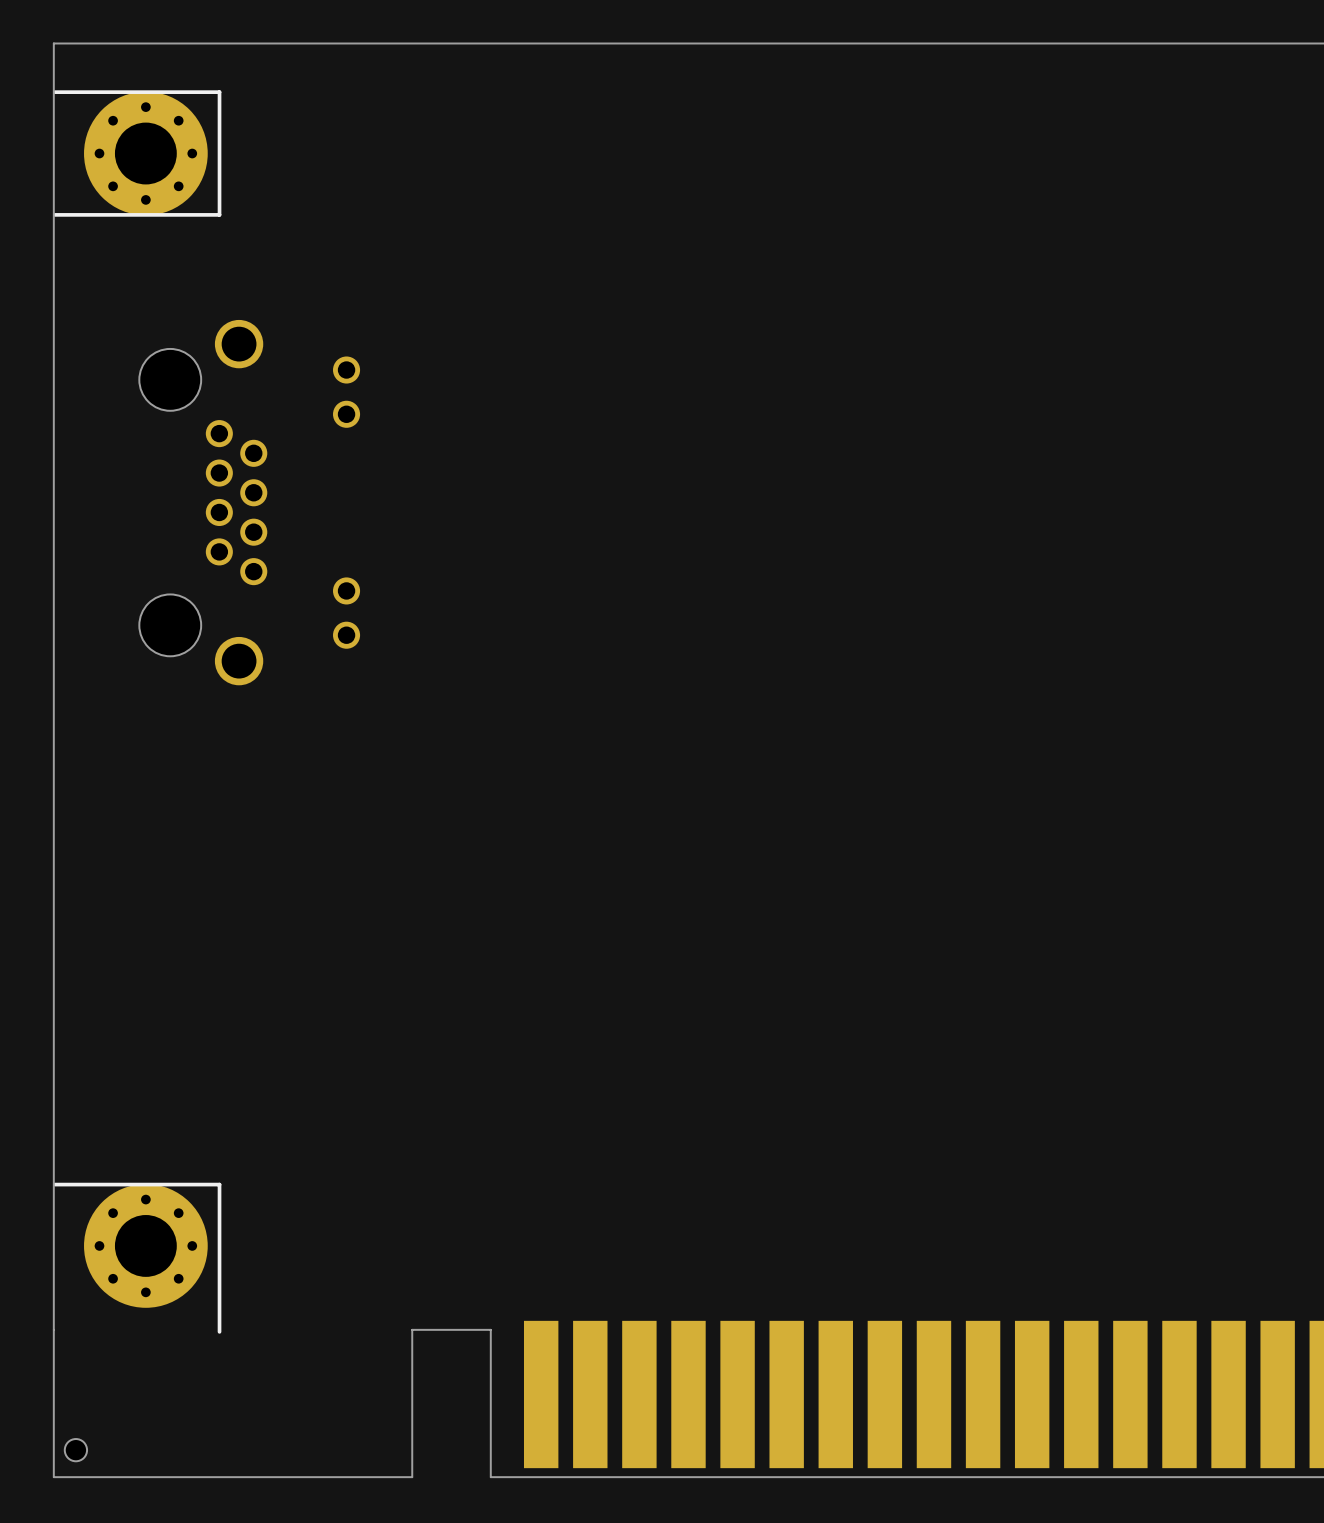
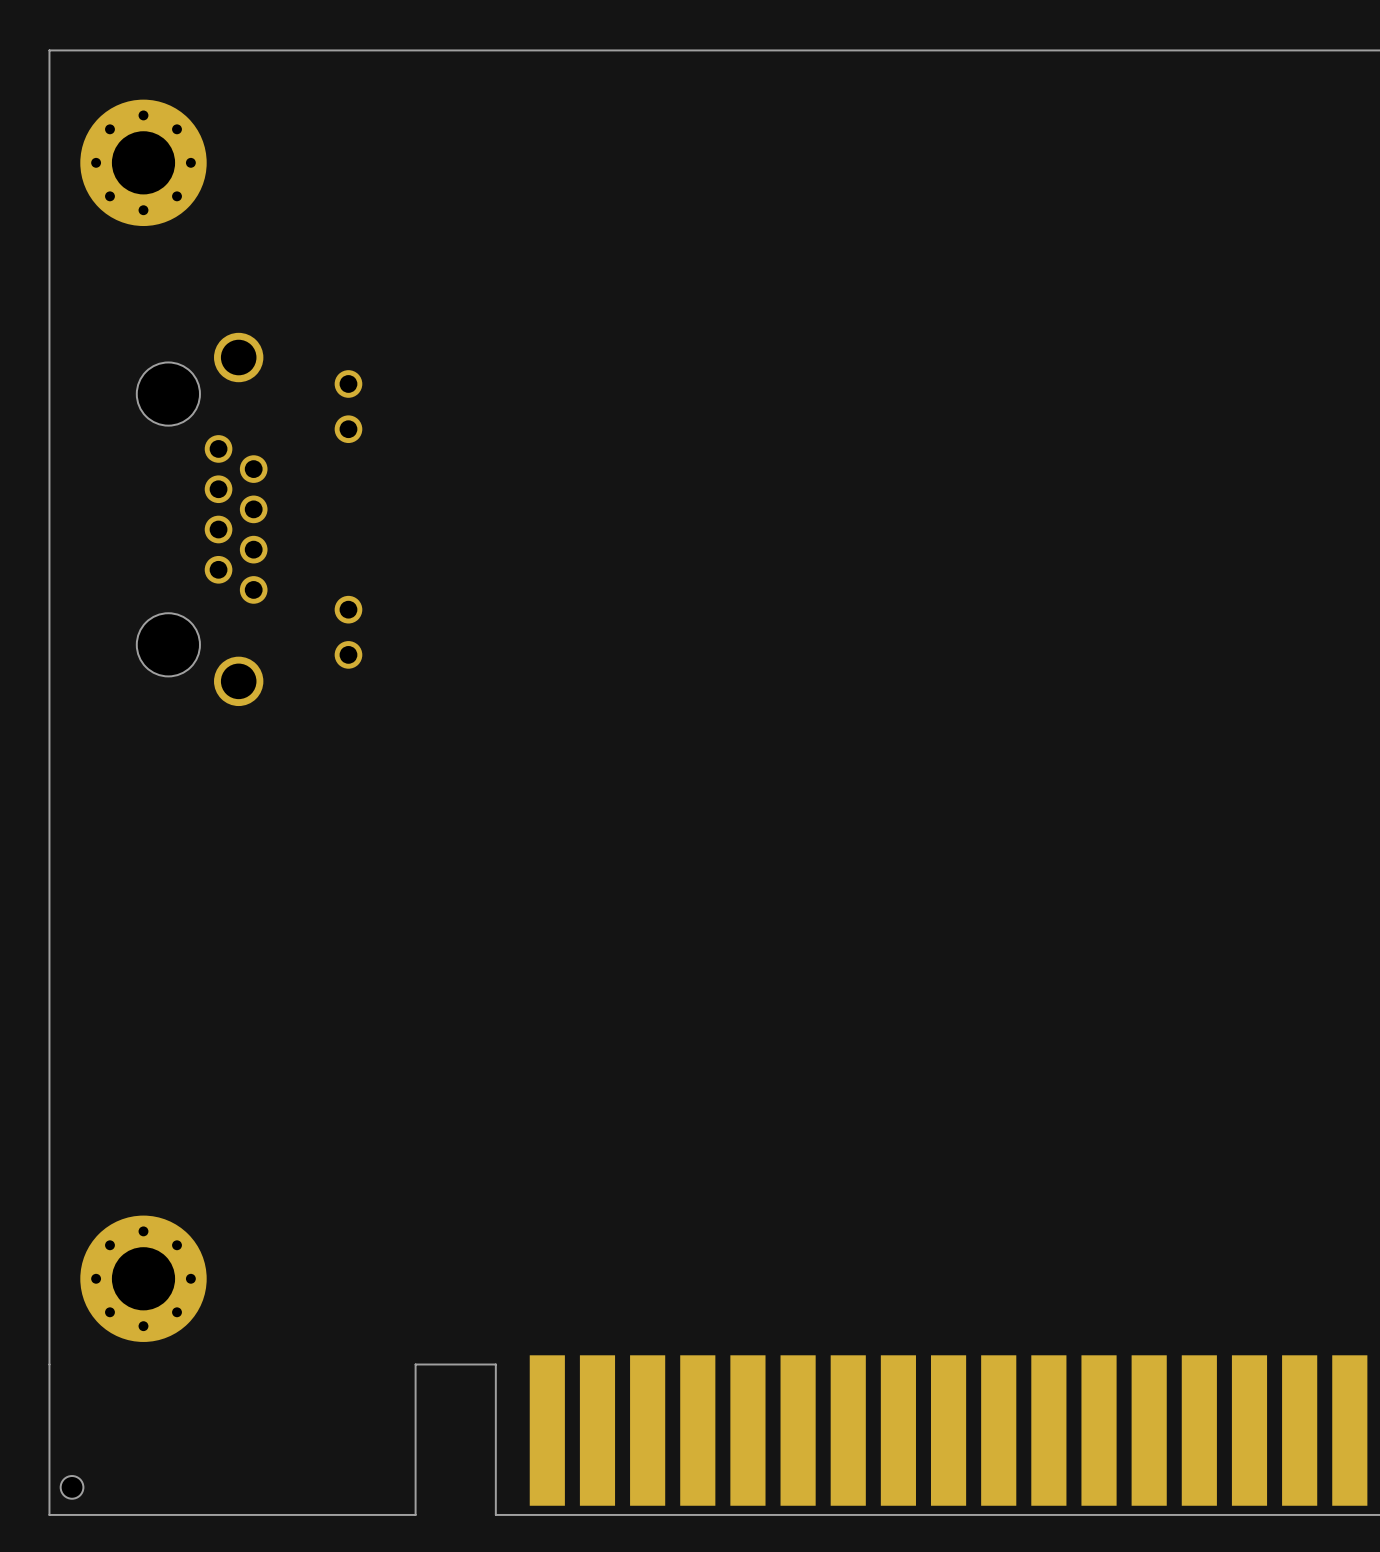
line: (55, 92) (219, 92) (219, 214) (55, 214) -> none
line: (55, 1184) (219, 1184) (219, 1331) -> none

